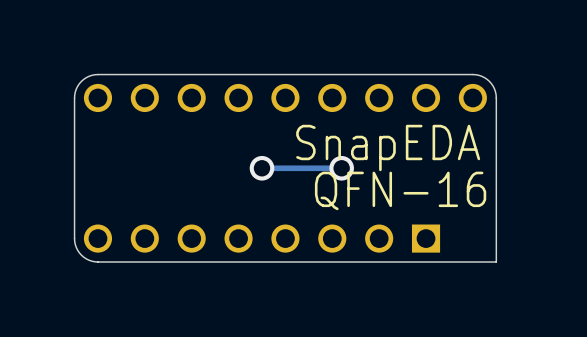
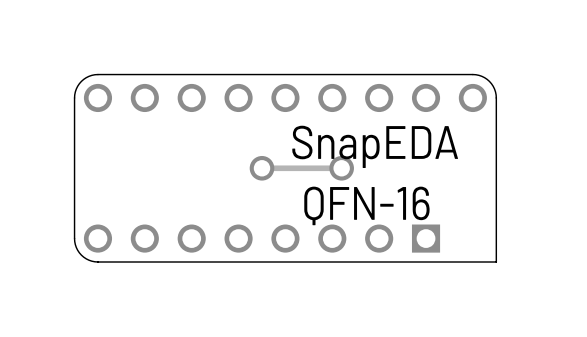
text position: QFN-16 (400, 190) -> QFN-16 (366, 205)

